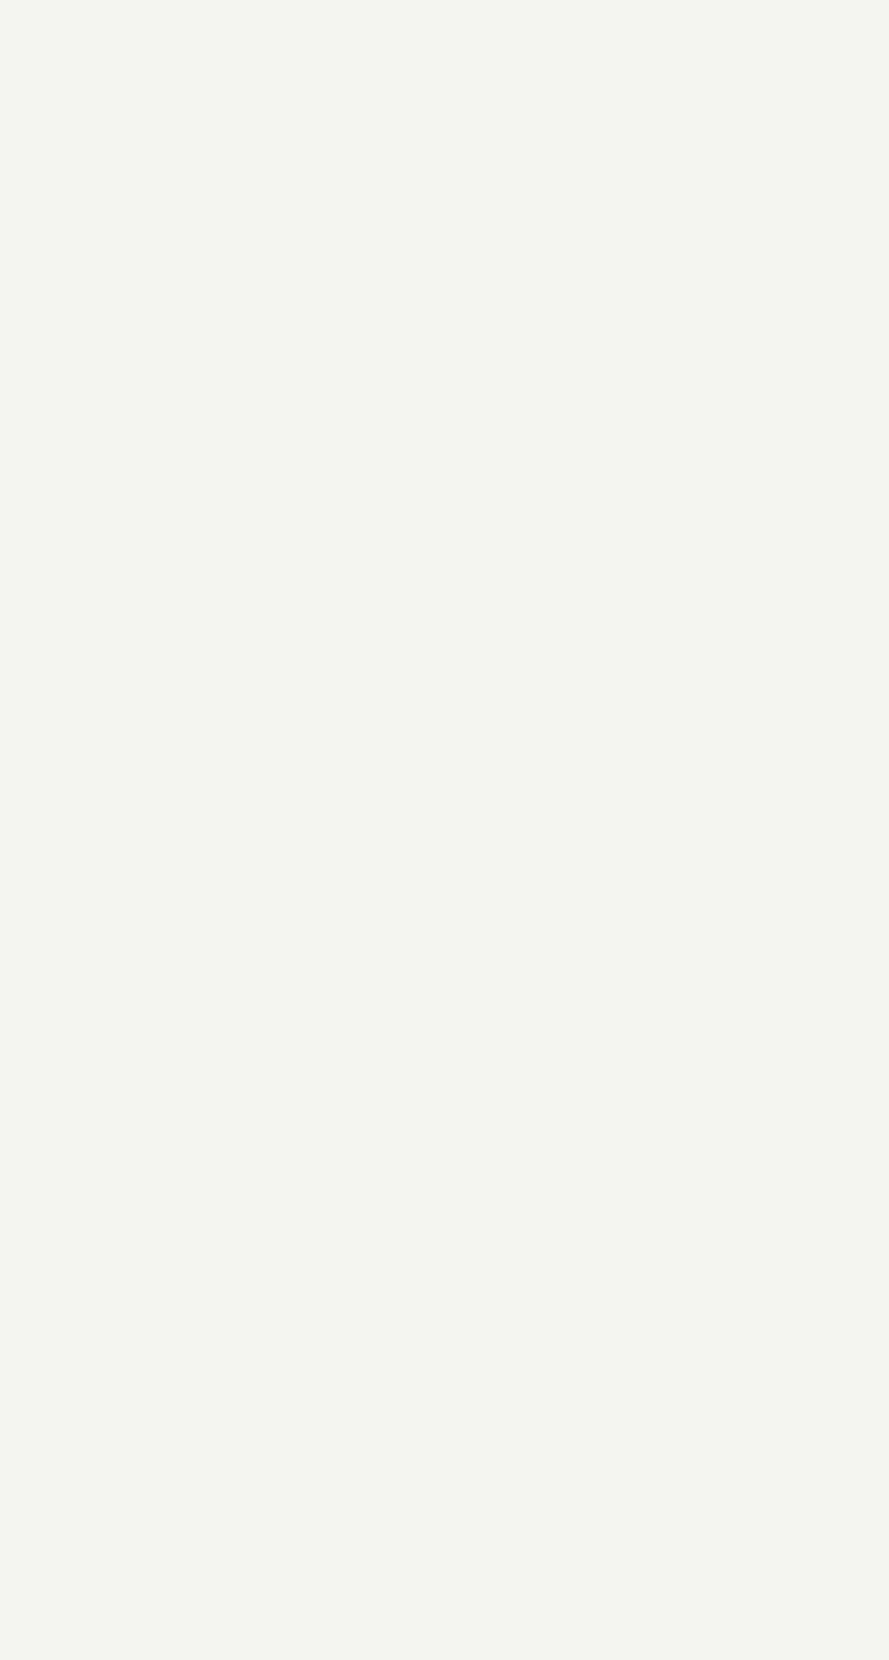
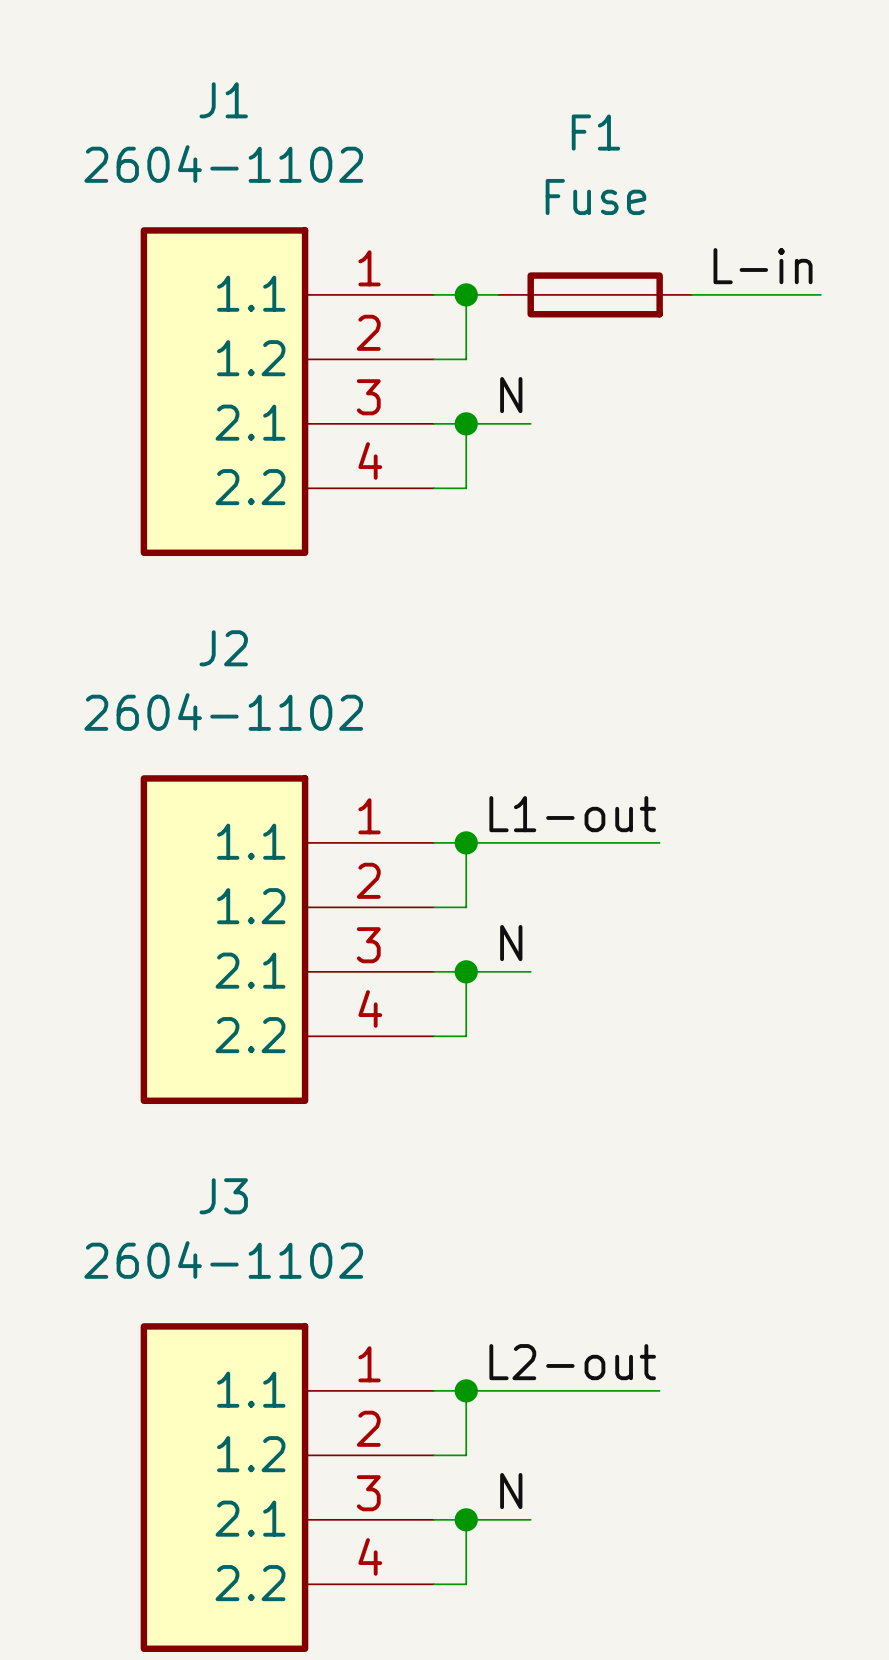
label: none -> L-in (763, 266)
wire: none -> (434, 294) (498, 294)
wire: none -> (466, 294) (466, 359) (434, 359)
junction: none -> (466, 294)
F1: none -> Fuse (595, 294)
wire: none -> (691, 294) (820, 294)
J1: none -> 2604-1102 (287, 391)
label: none -> N (511, 395)
wire: none -> (434, 423) (530, 423)
wire: none -> (466, 423) (466, 488) (434, 488)
junction: none -> (466, 423)
label: none -> L1-out (572, 814)
wire: none -> (434, 842) (659, 842)
wire: none -> (466, 842) (466, 907) (434, 907)
junction: none -> (466, 842)
J2: none -> 2604-1102 (287, 939)
label: none -> N (511, 943)
wire: none -> (434, 971) (530, 971)
wire: none -> (466, 971) (466, 1036) (434, 1036)
junction: none -> (466, 971)
label: none -> L2-out (572, 1362)
wire: none -> (434, 1390) (659, 1390)
wire: none -> (466, 1390) (466, 1455) (434, 1455)
junction: none -> (466, 1390)
J3: none -> 2604-1102 (287, 1487)
label: none -> N (511, 1491)
wire: none -> (434, 1519) (530, 1519)
wire: none -> (466, 1519) (466, 1584) (434, 1584)
junction: none -> (466, 1519)

